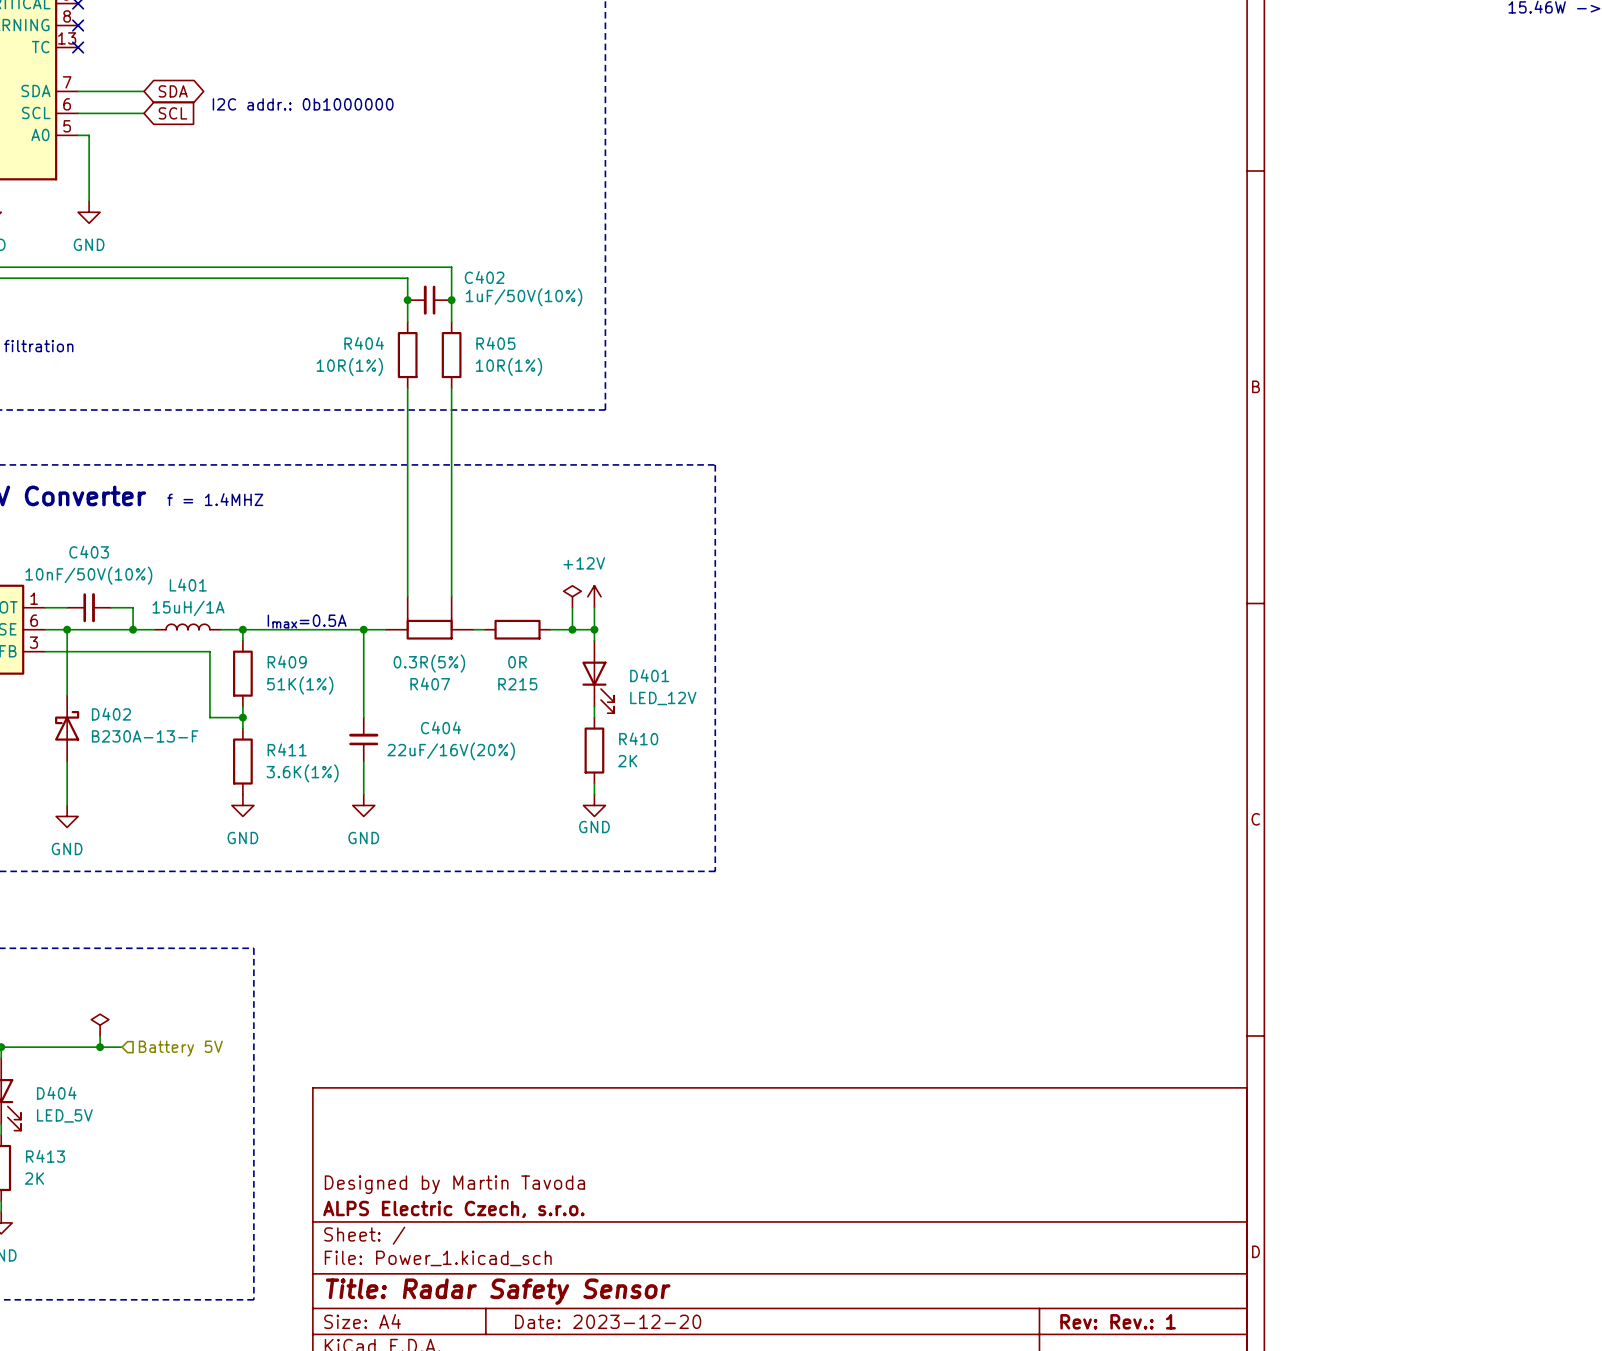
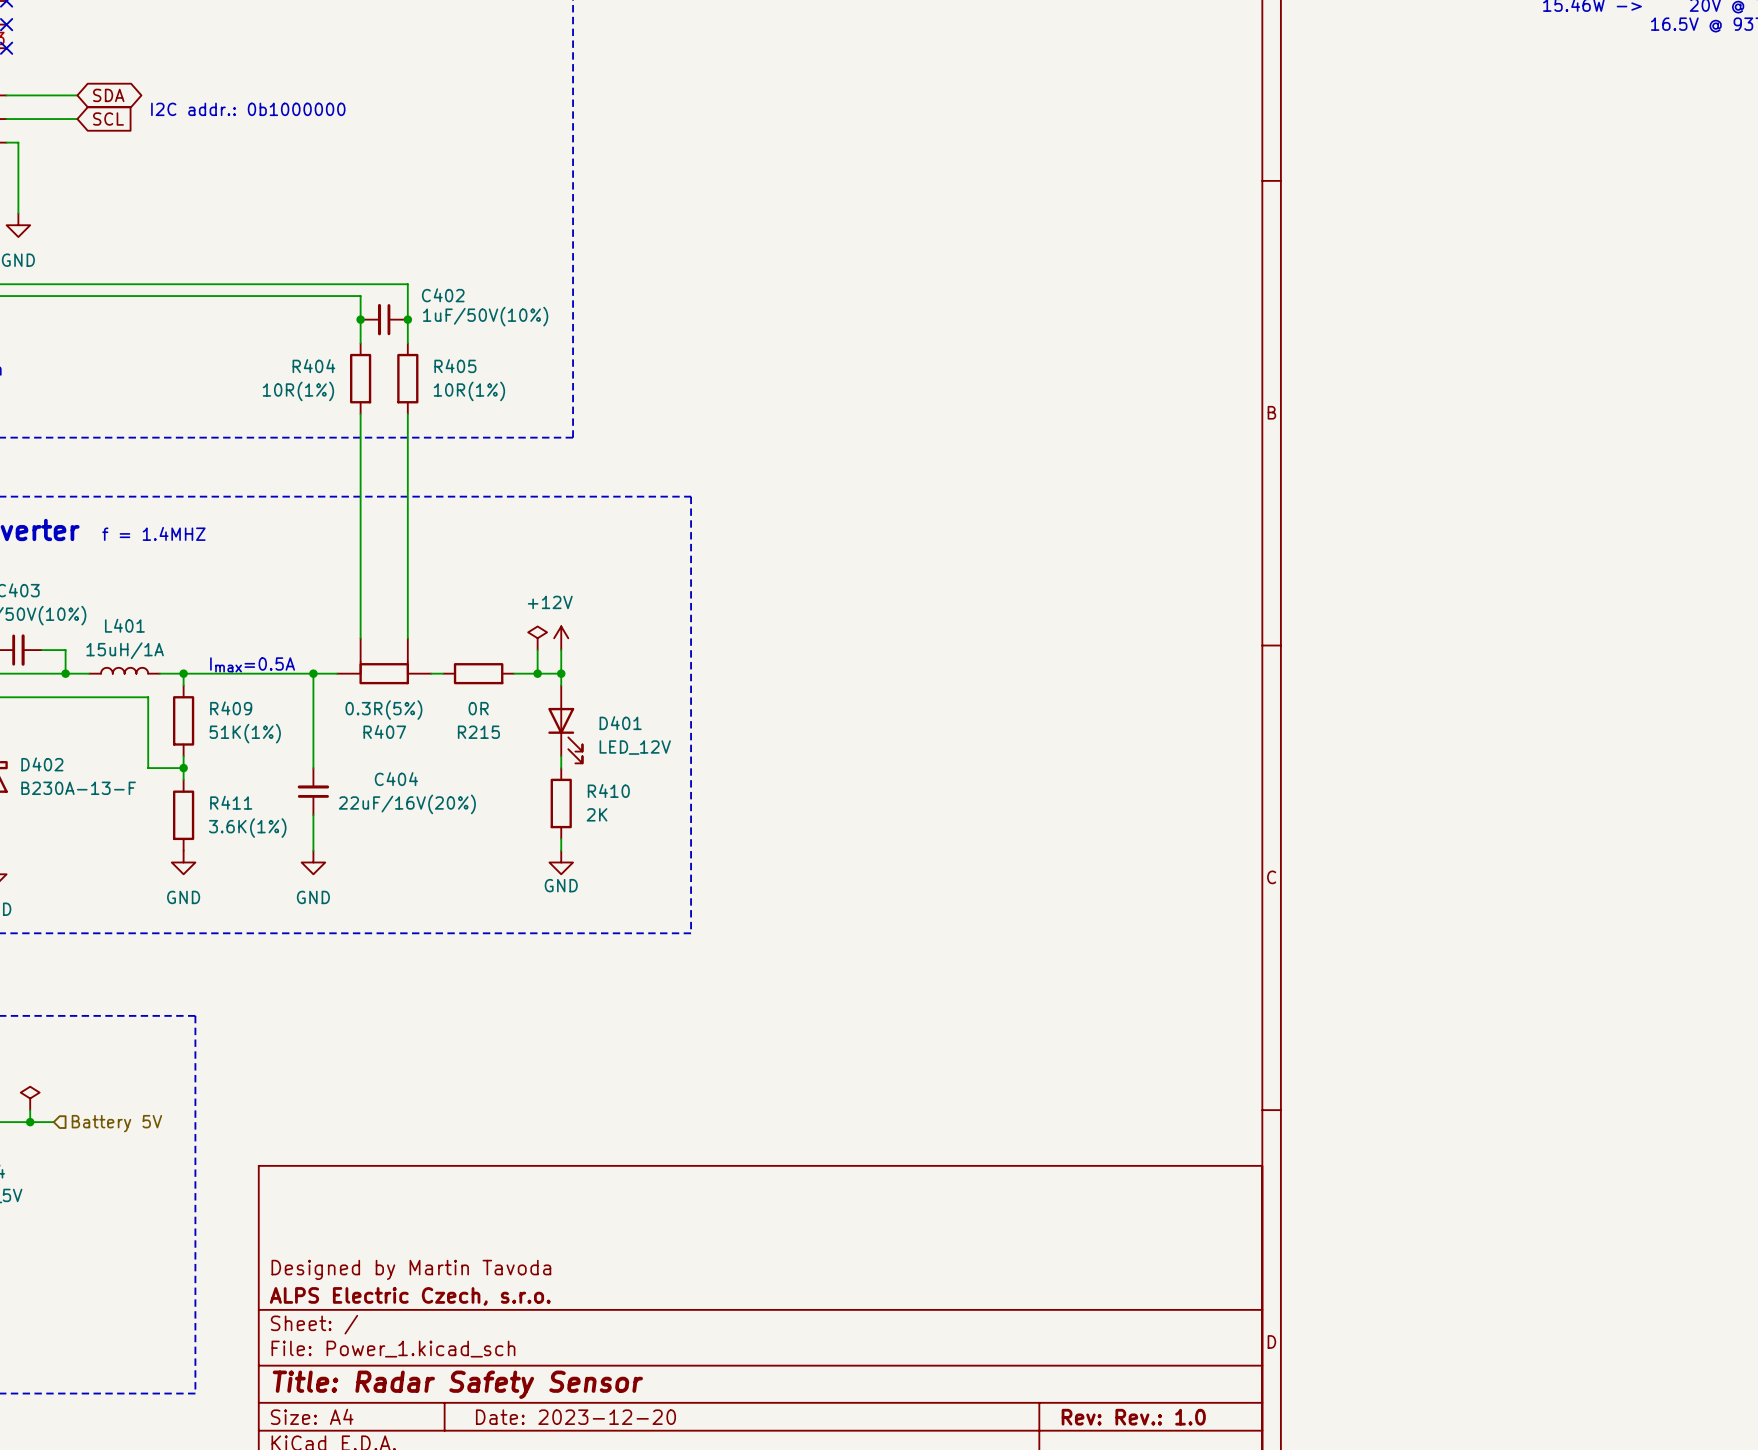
title block: Rev: Rev.: 1 (1118, 1321) -> Rev: Rev.: 1.0 (1133, 1417)

